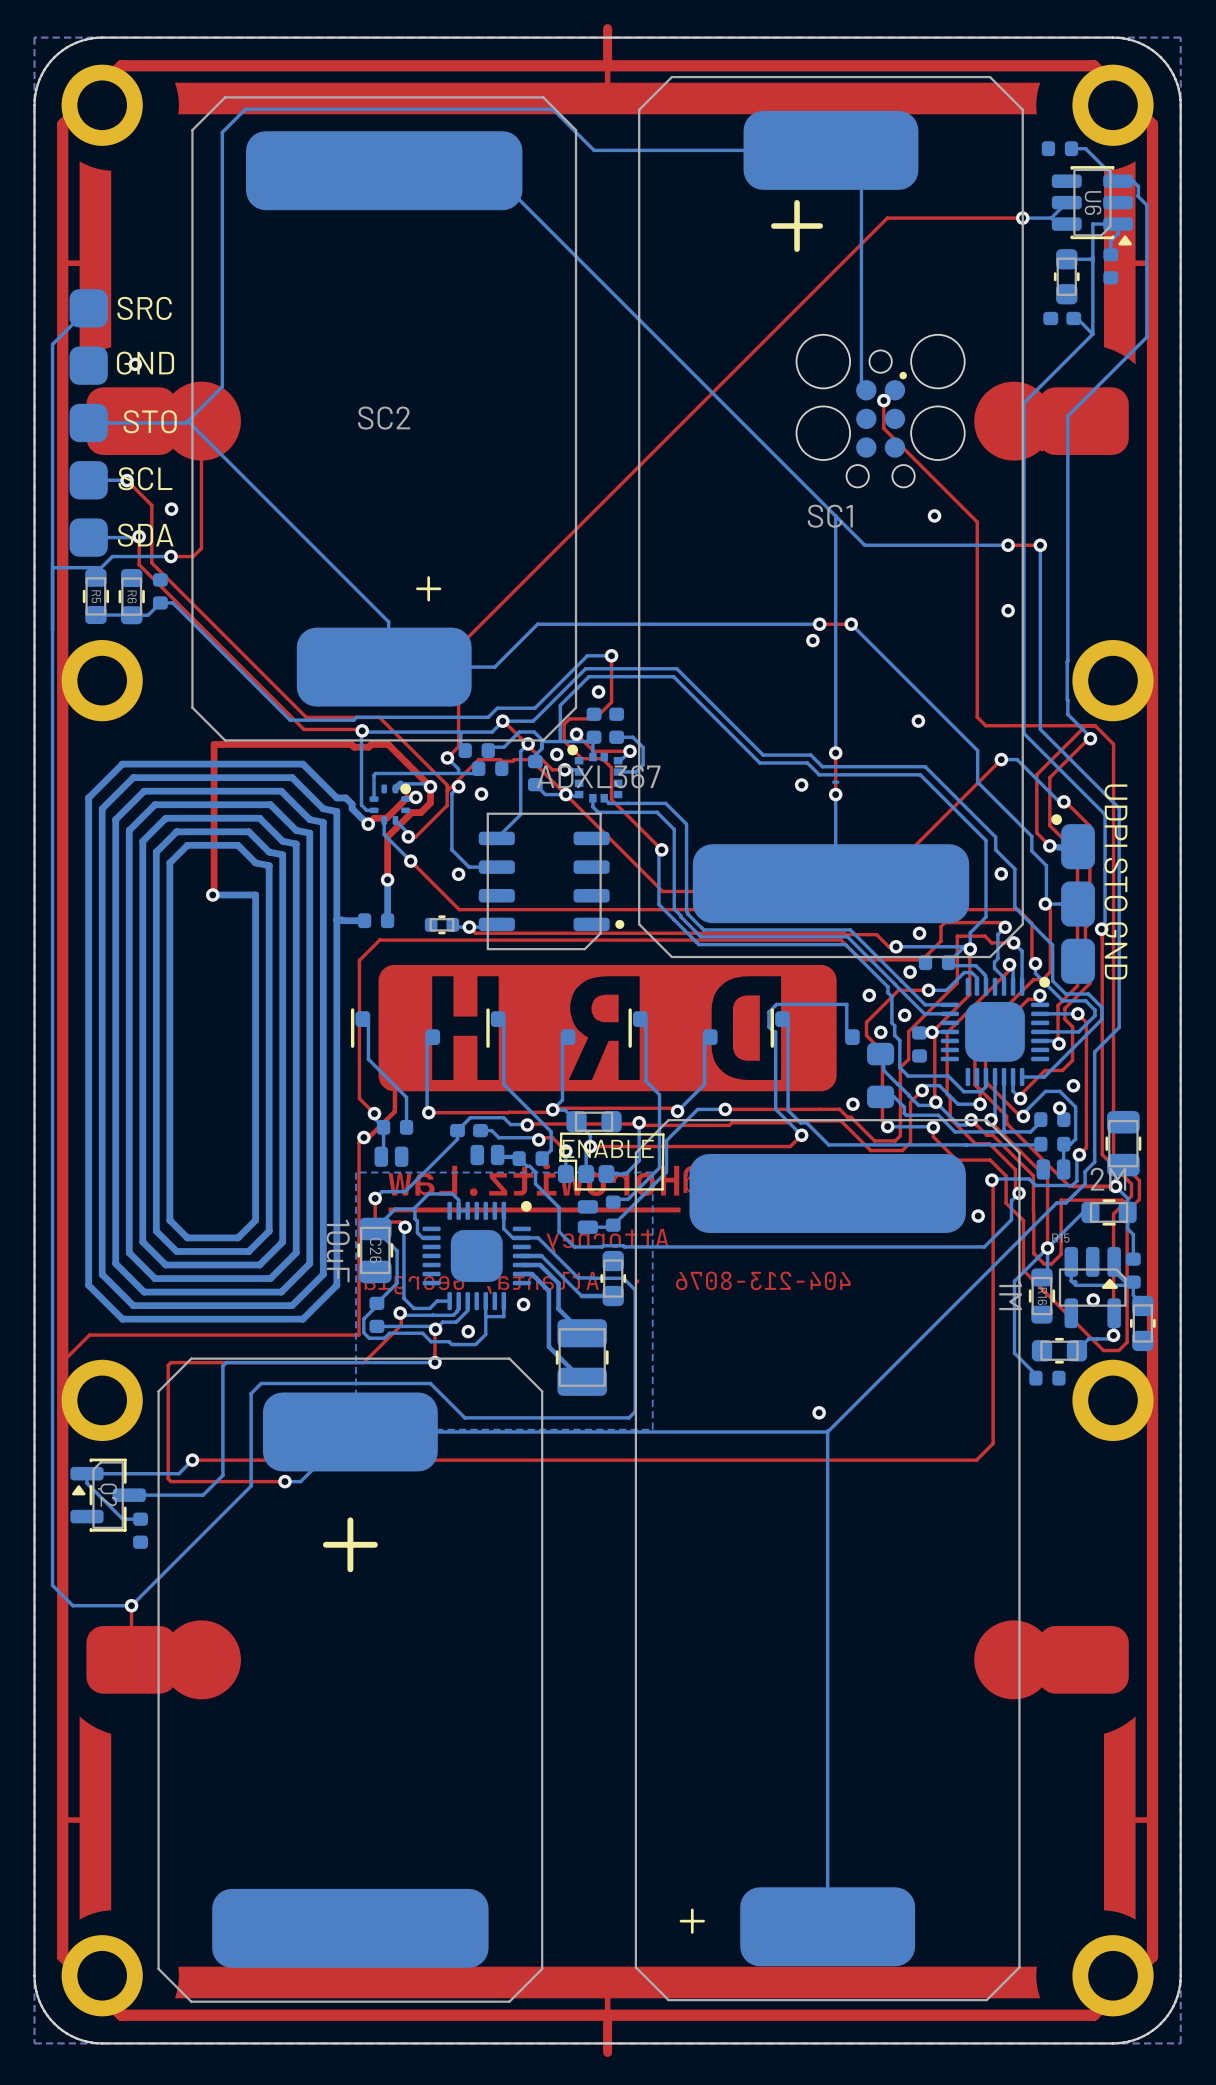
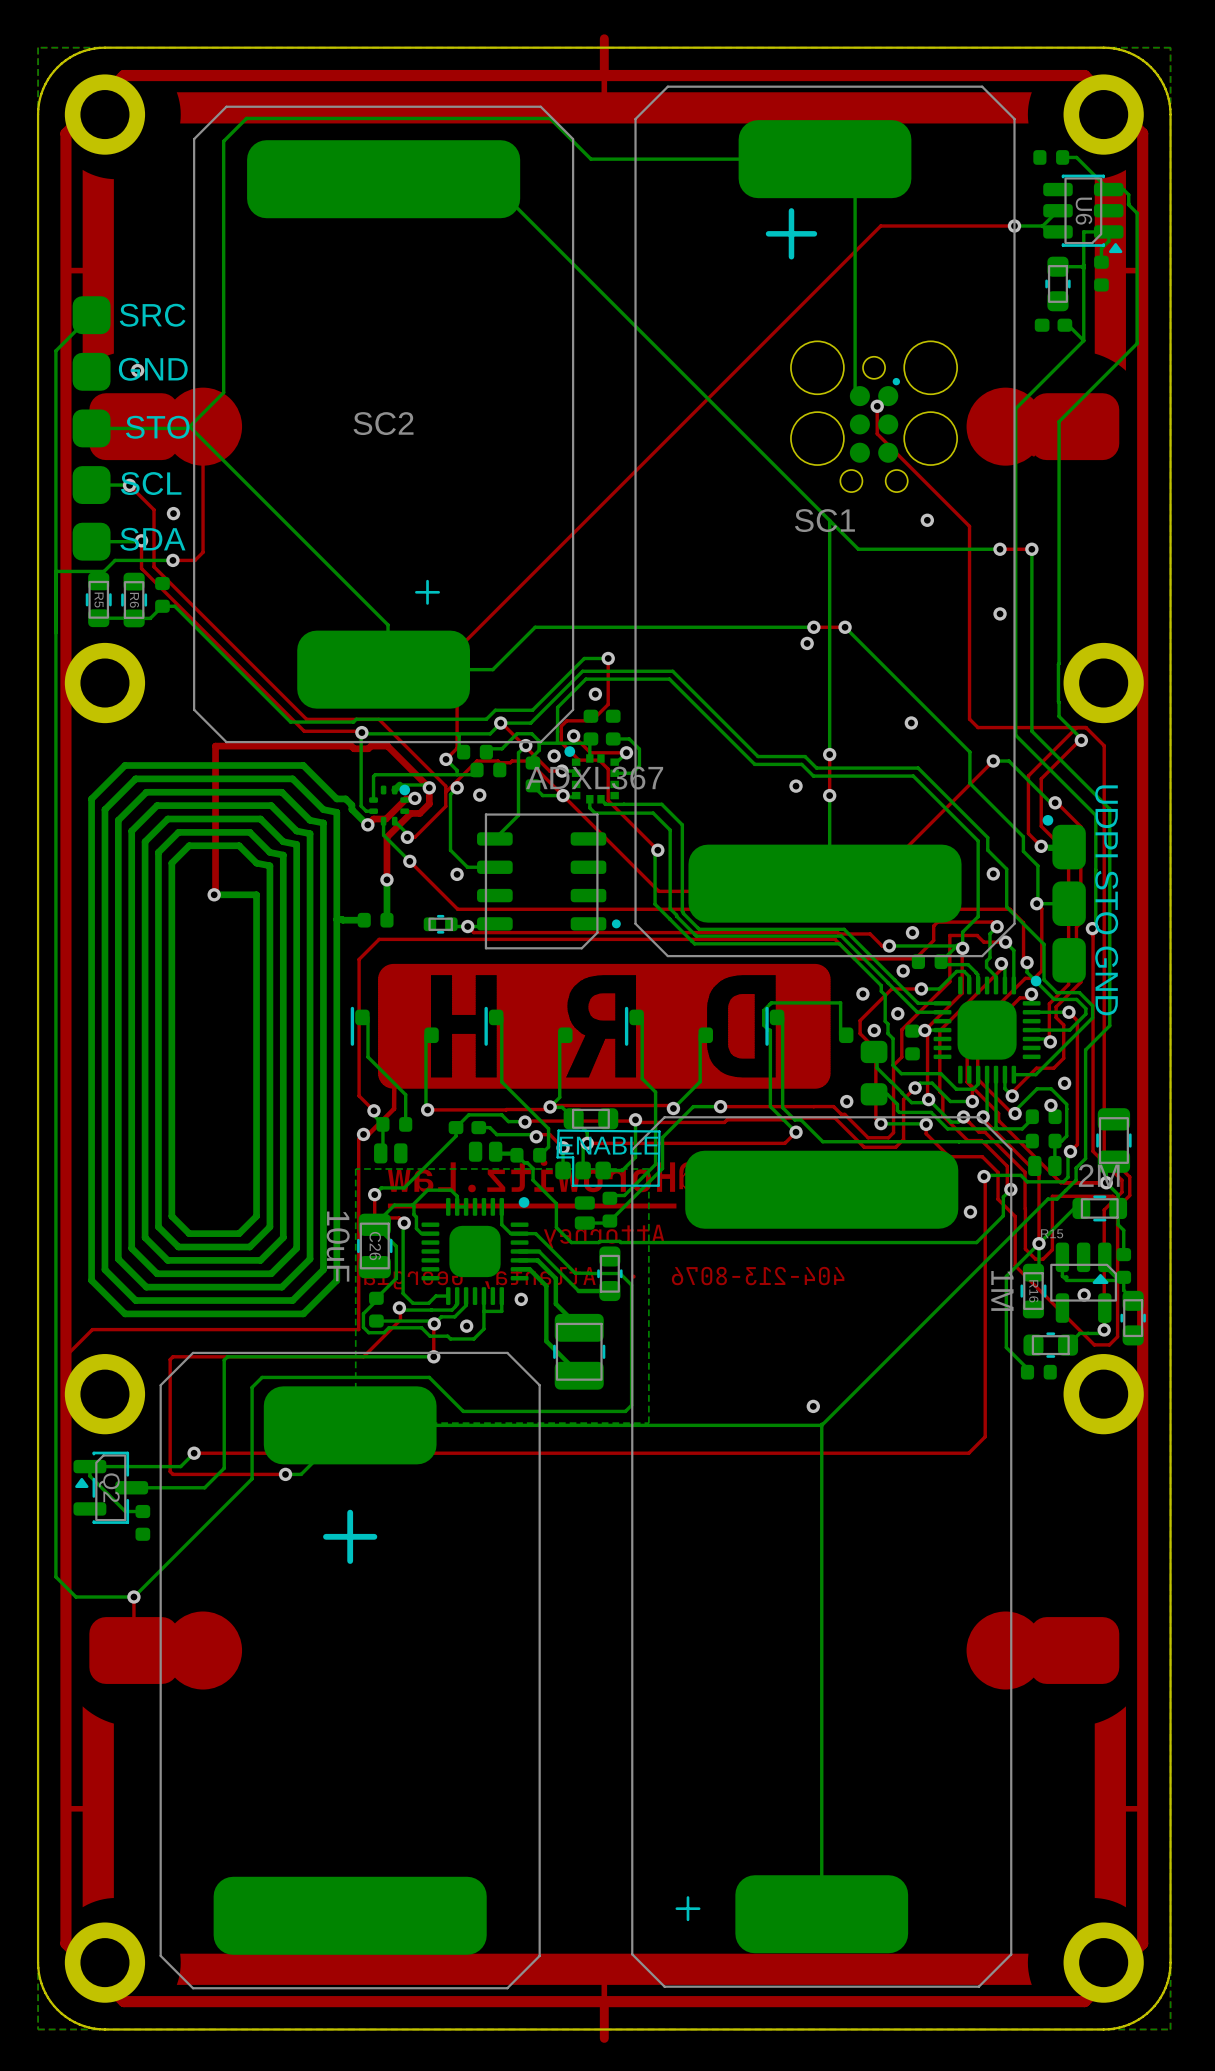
bottom track: (837, 782) (833, 782) -> none

